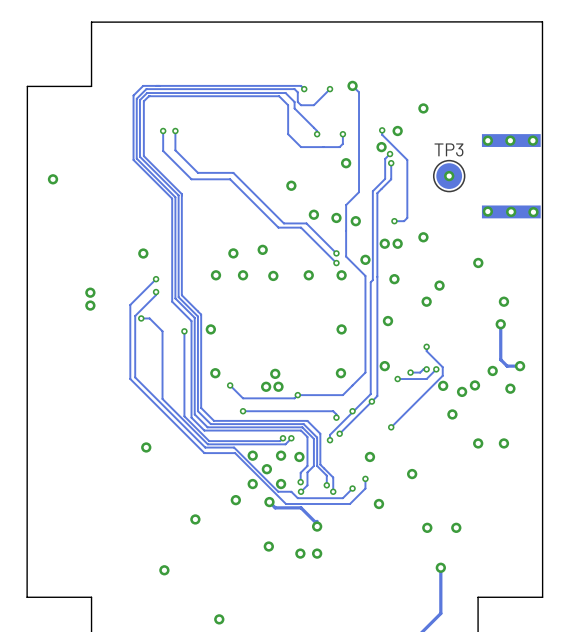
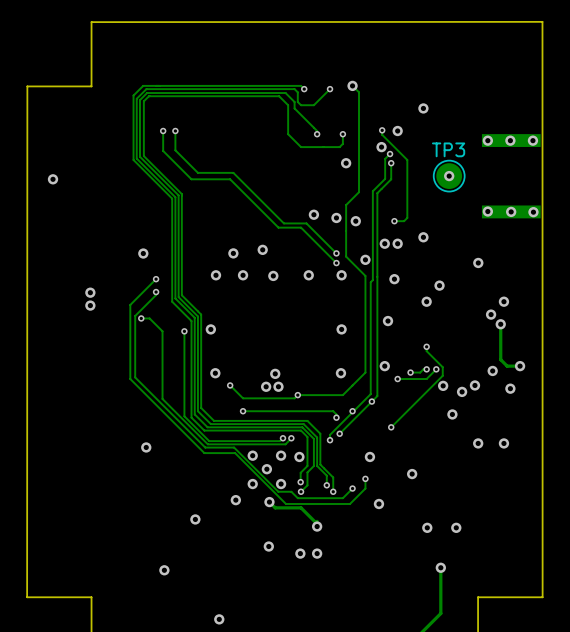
via: (291, 185) -> none
via: none -> (491, 314)

